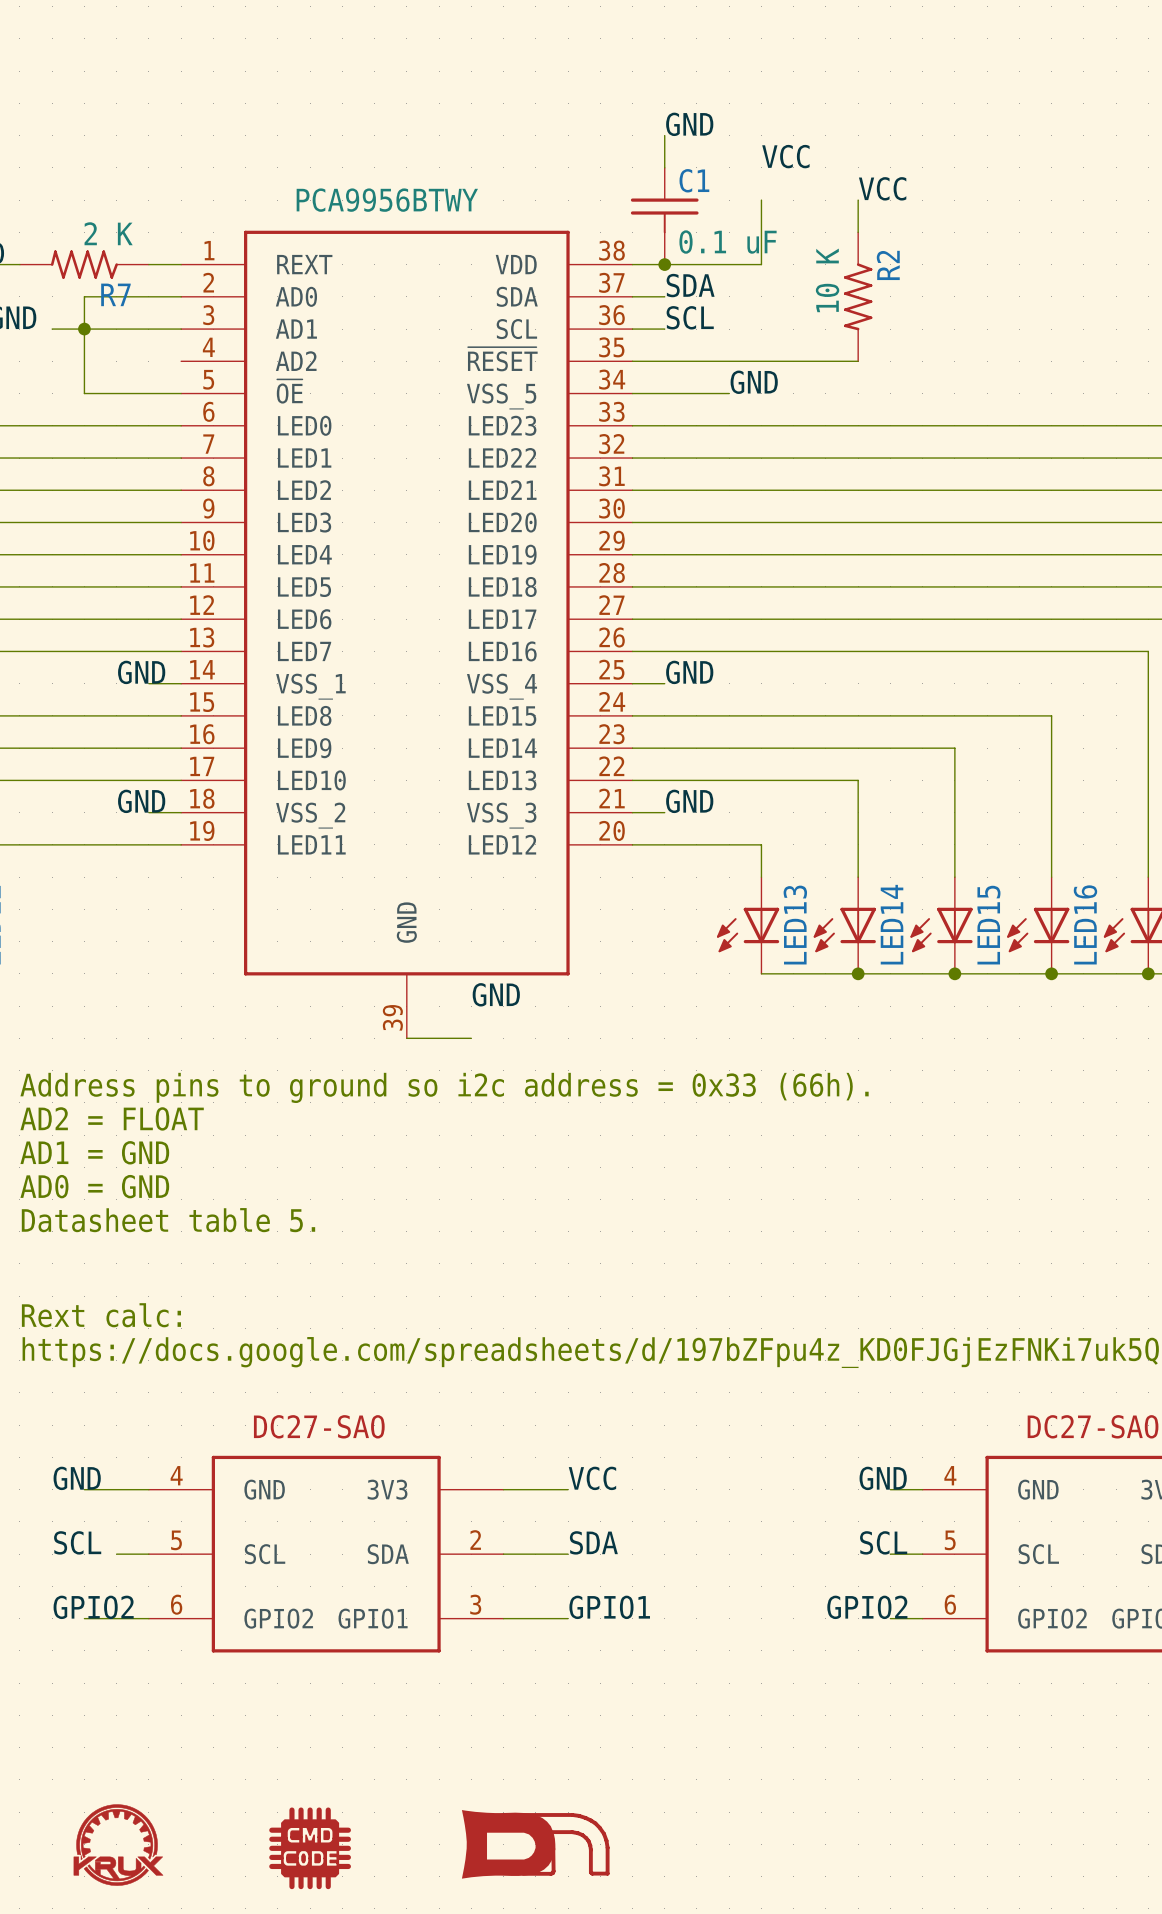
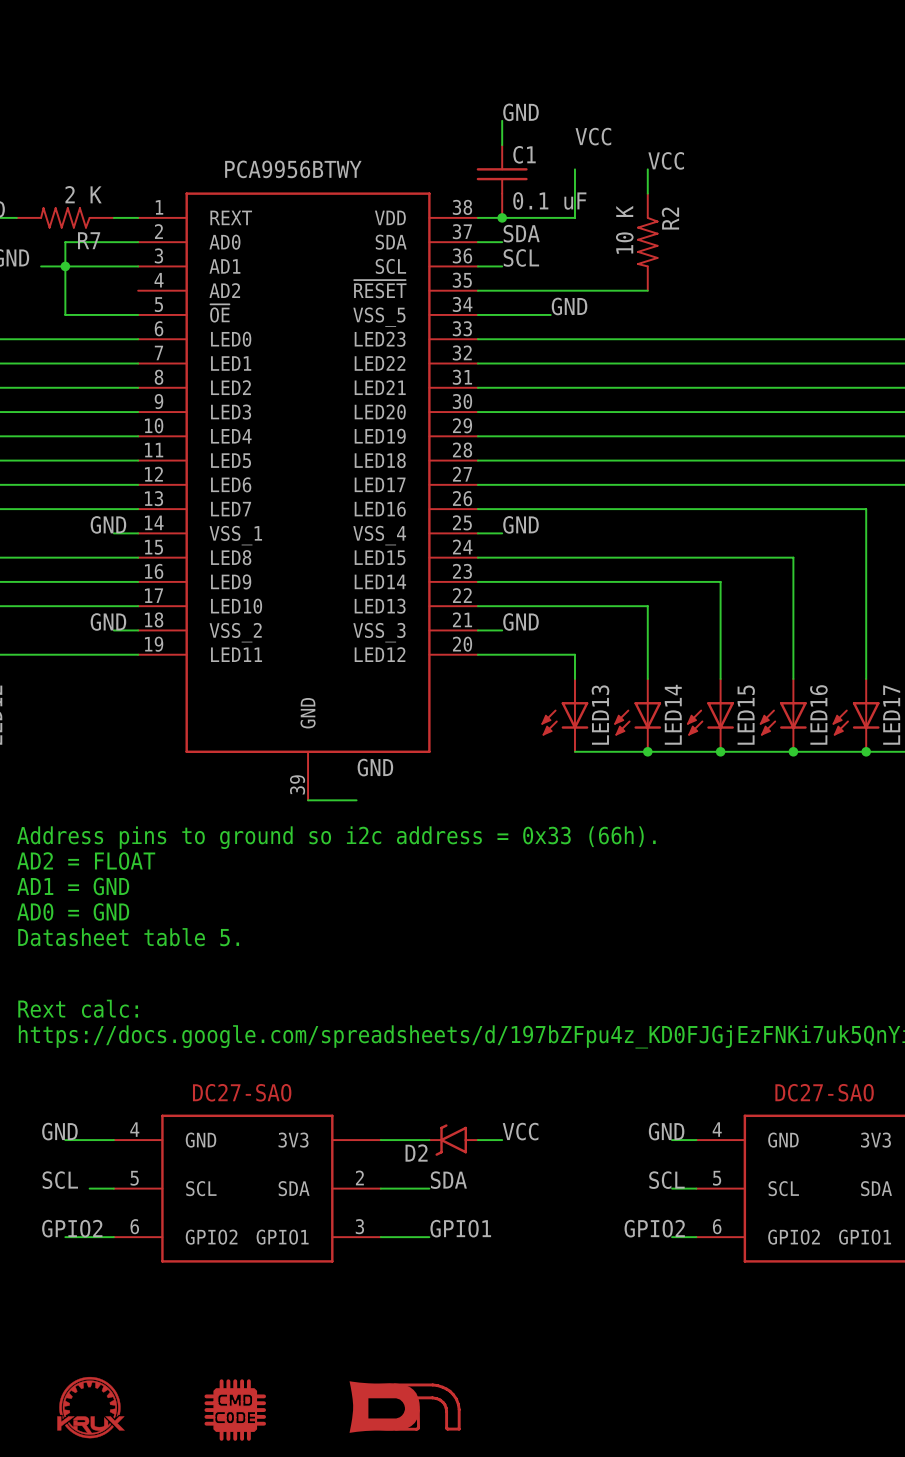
label position: VCC (592, 1478) -> VCC (520, 1131)
D2: none -> (453, 1140)
wire: none -> (477, 1140) (502, 1140)

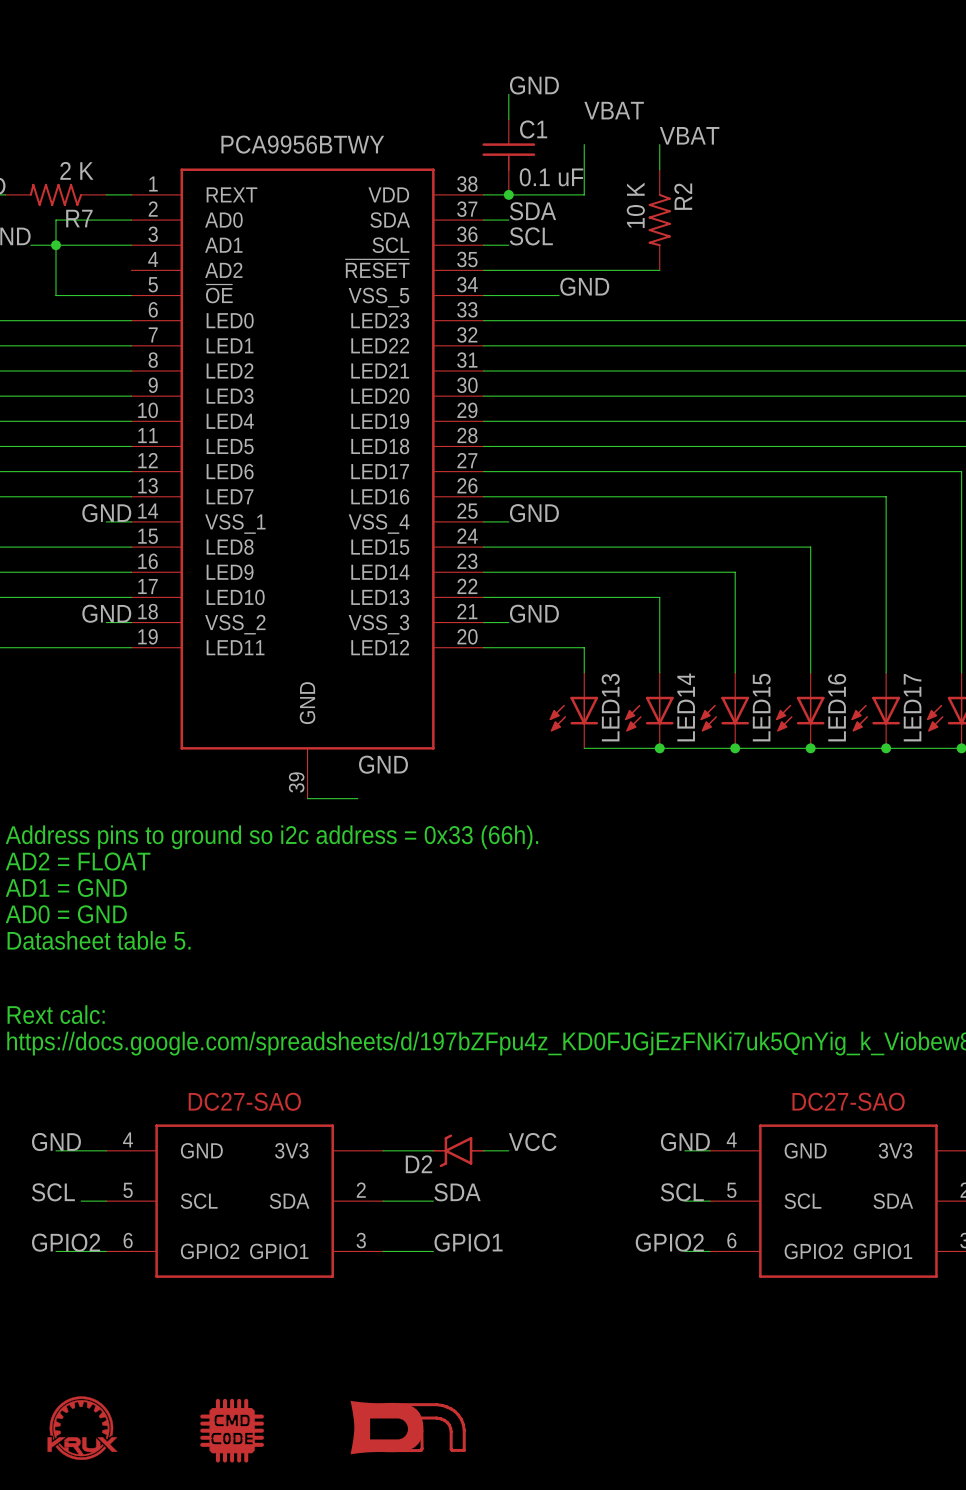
label: VCC (593, 136) -> VBAT (614, 110)
label: VCC (666, 160) -> VBAT (689, 135)

